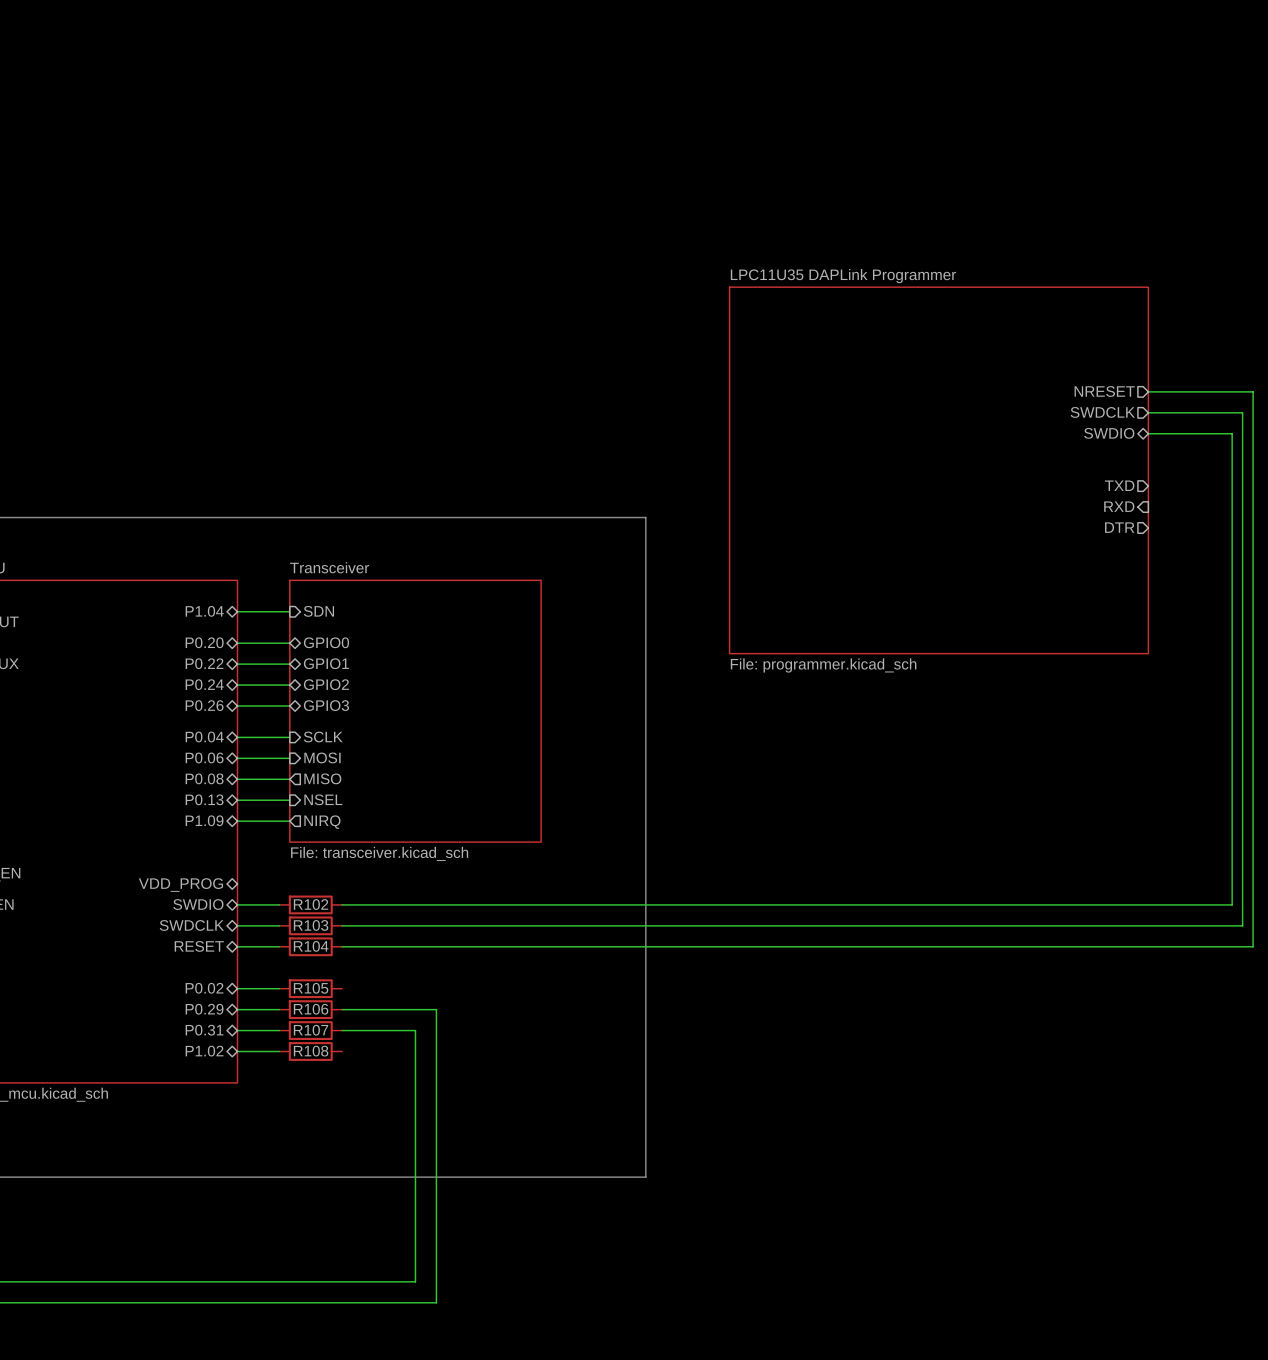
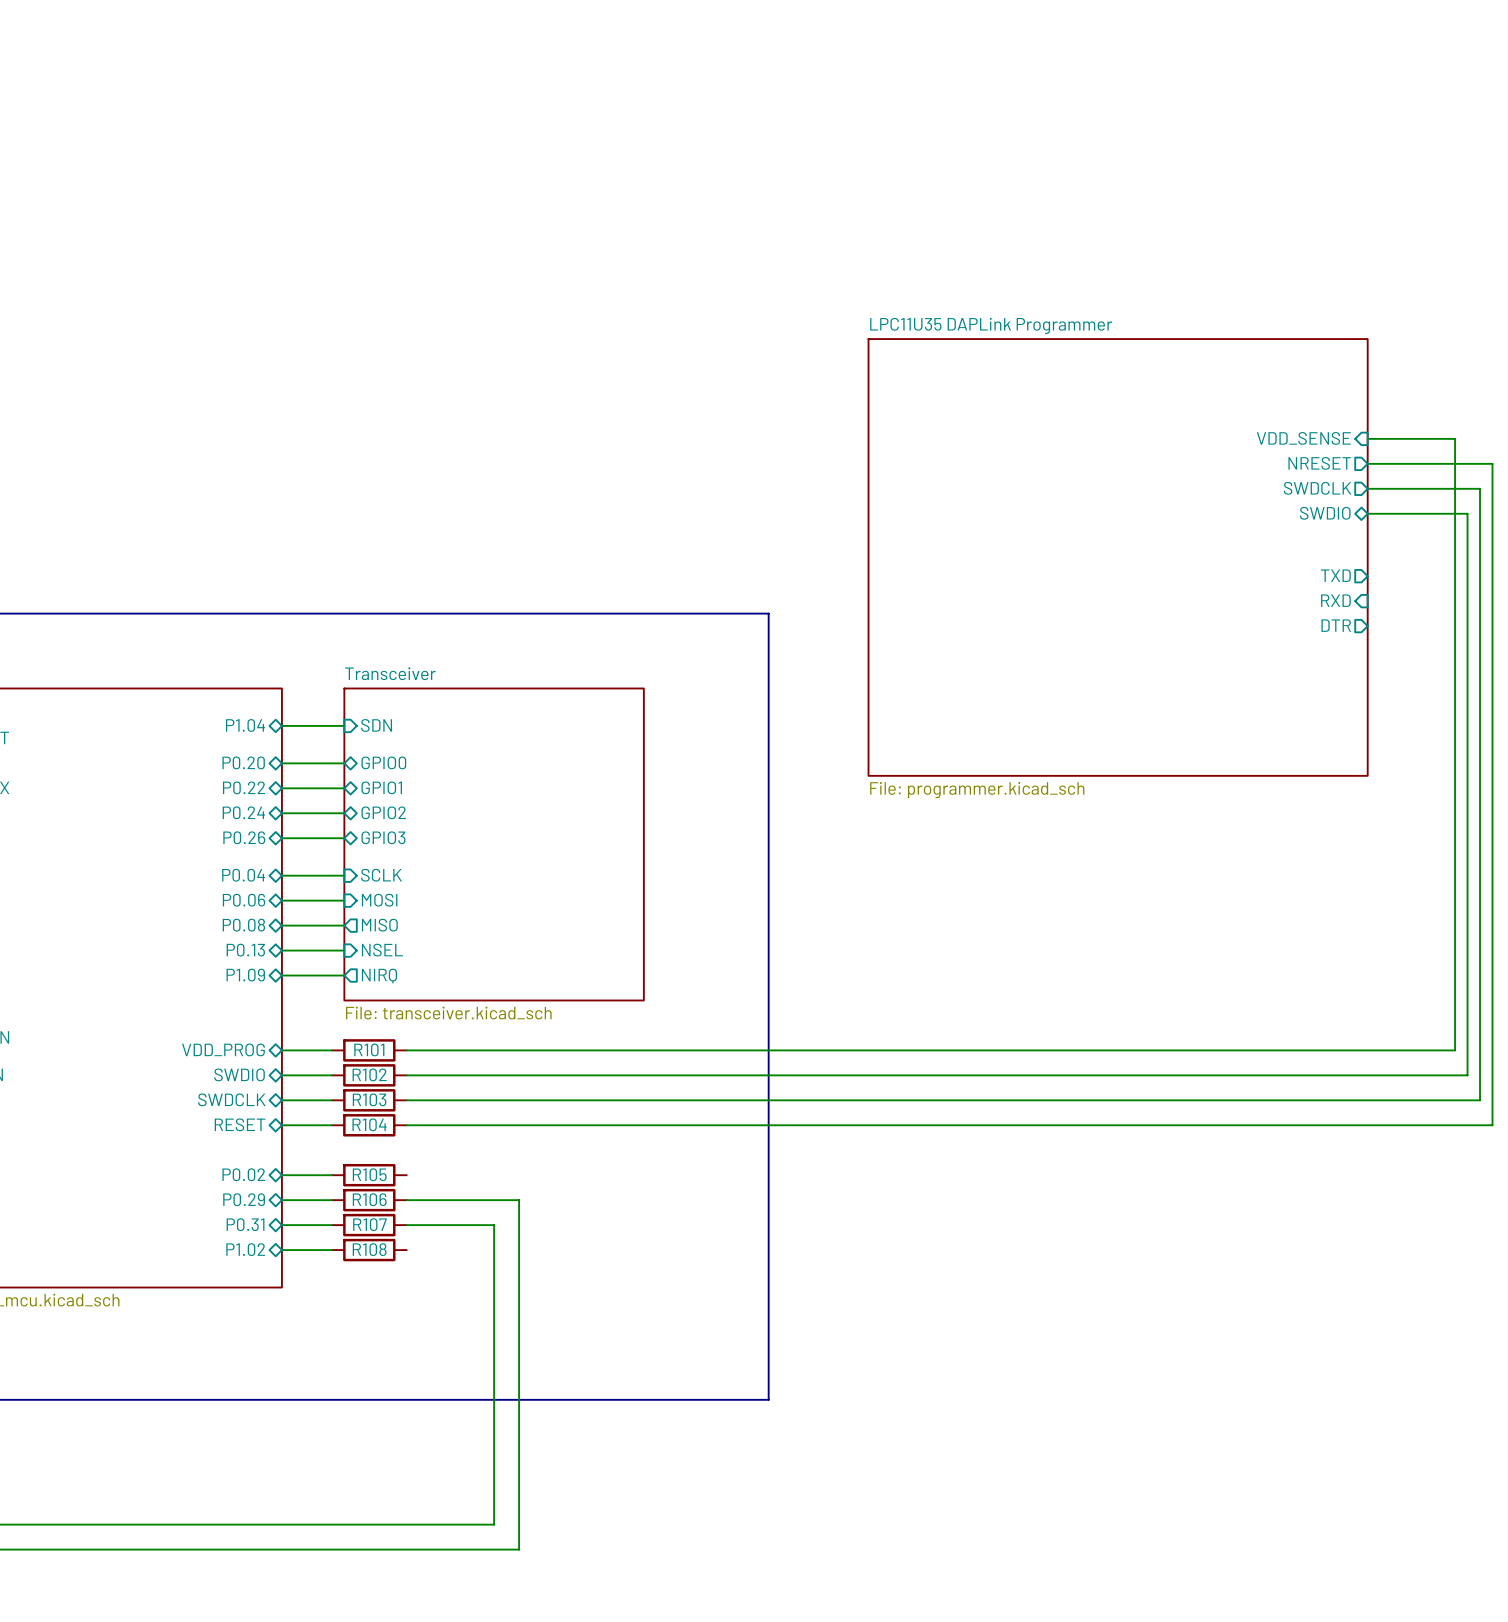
wire: none -> (1367, 438) (1455, 438) (1455, 1050) (406, 1050)
sheet pin: none -> VDD_SENSE (1303, 438)
wire: none -> (281, 1050) (331, 1050)
R101: none -> (369, 1050)

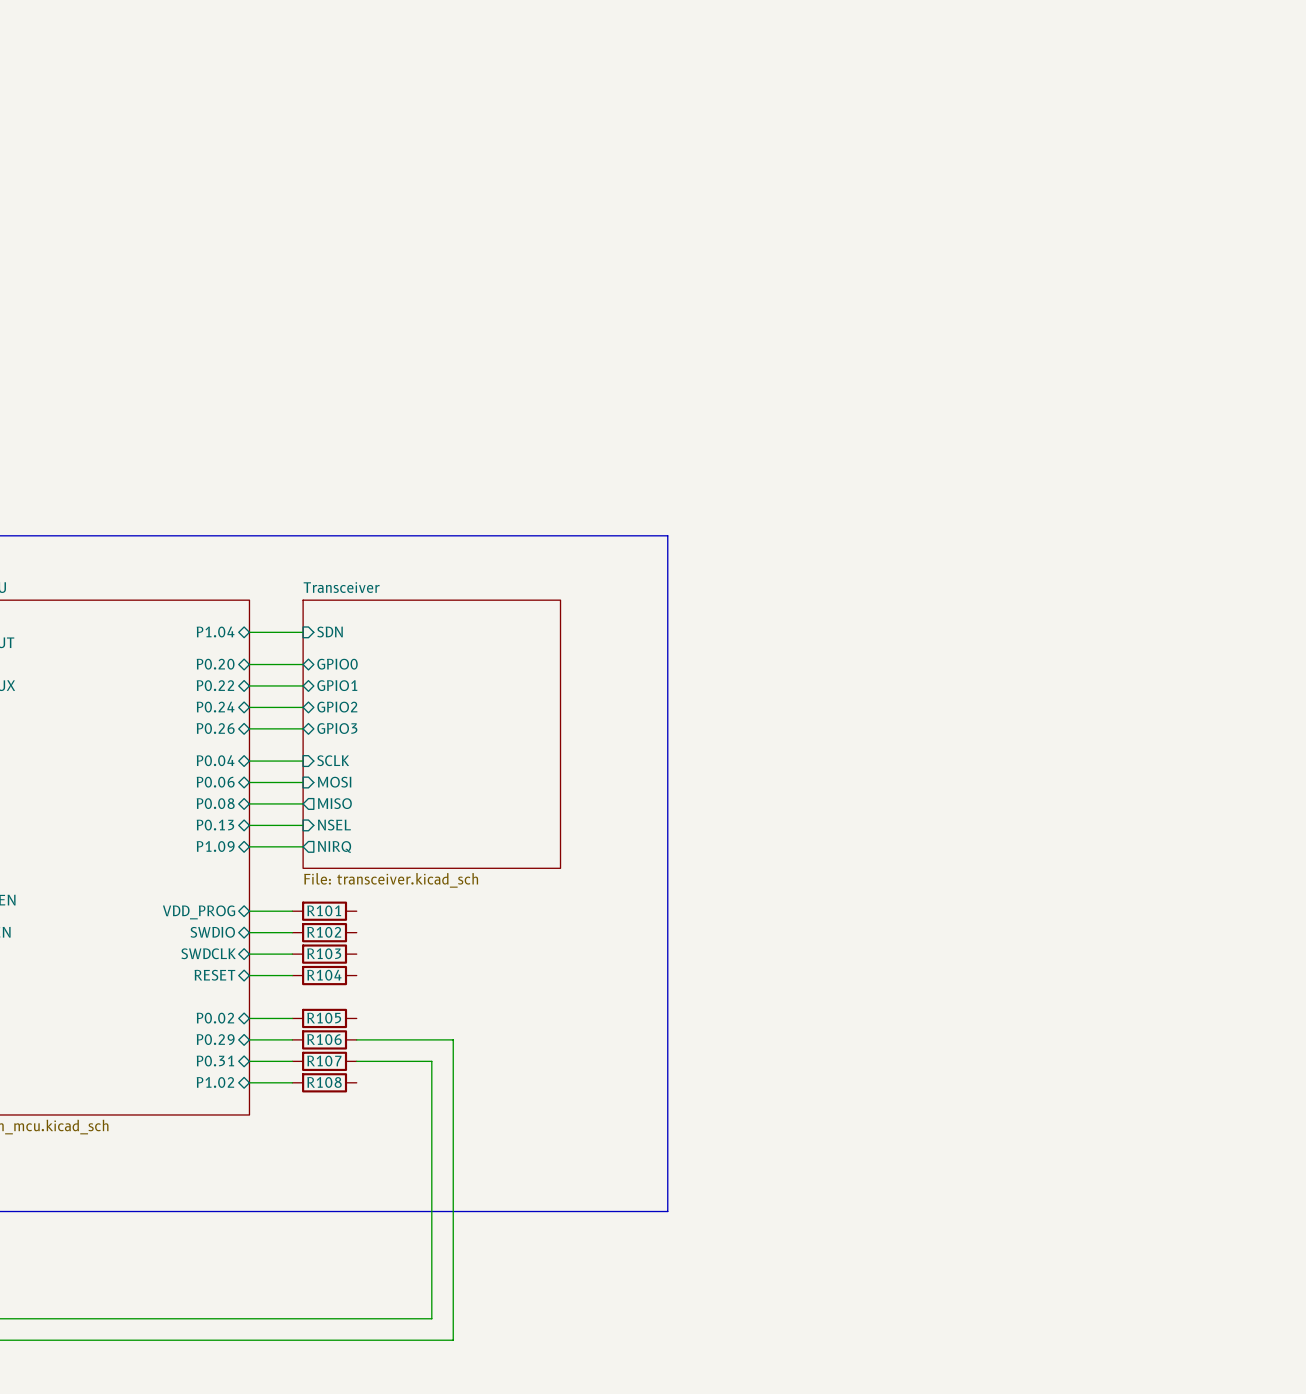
sheet pin: VDD_SENSE (1303, 438) -> none
wire: (1367, 438) (1455, 438) (1455, 1050) (406, 1050) -> none
sheet pin: NRESET (1319, 463) -> none
wire: (1367, 463) (1492, 463) (1492, 1125) (406, 1125) -> none
sheet pin: SWDCLK (1317, 488) -> none
wire: (1367, 488) (1480, 488) (1480, 1100) (406, 1100) -> none
sheet pin: SWDIO (1325, 513) -> none
wire: (1367, 513) (1467, 513) (1467, 1075) (406, 1075) -> none
sheet LPC11U35 DAPLink Programmer: File: programmer.kicad_sch (1118, 557) -> none
sheet pin: TXD (1335, 575) -> none
sheet pin: RXD (1335, 600) -> none
sheet pin: DTR (1336, 625) -> none

